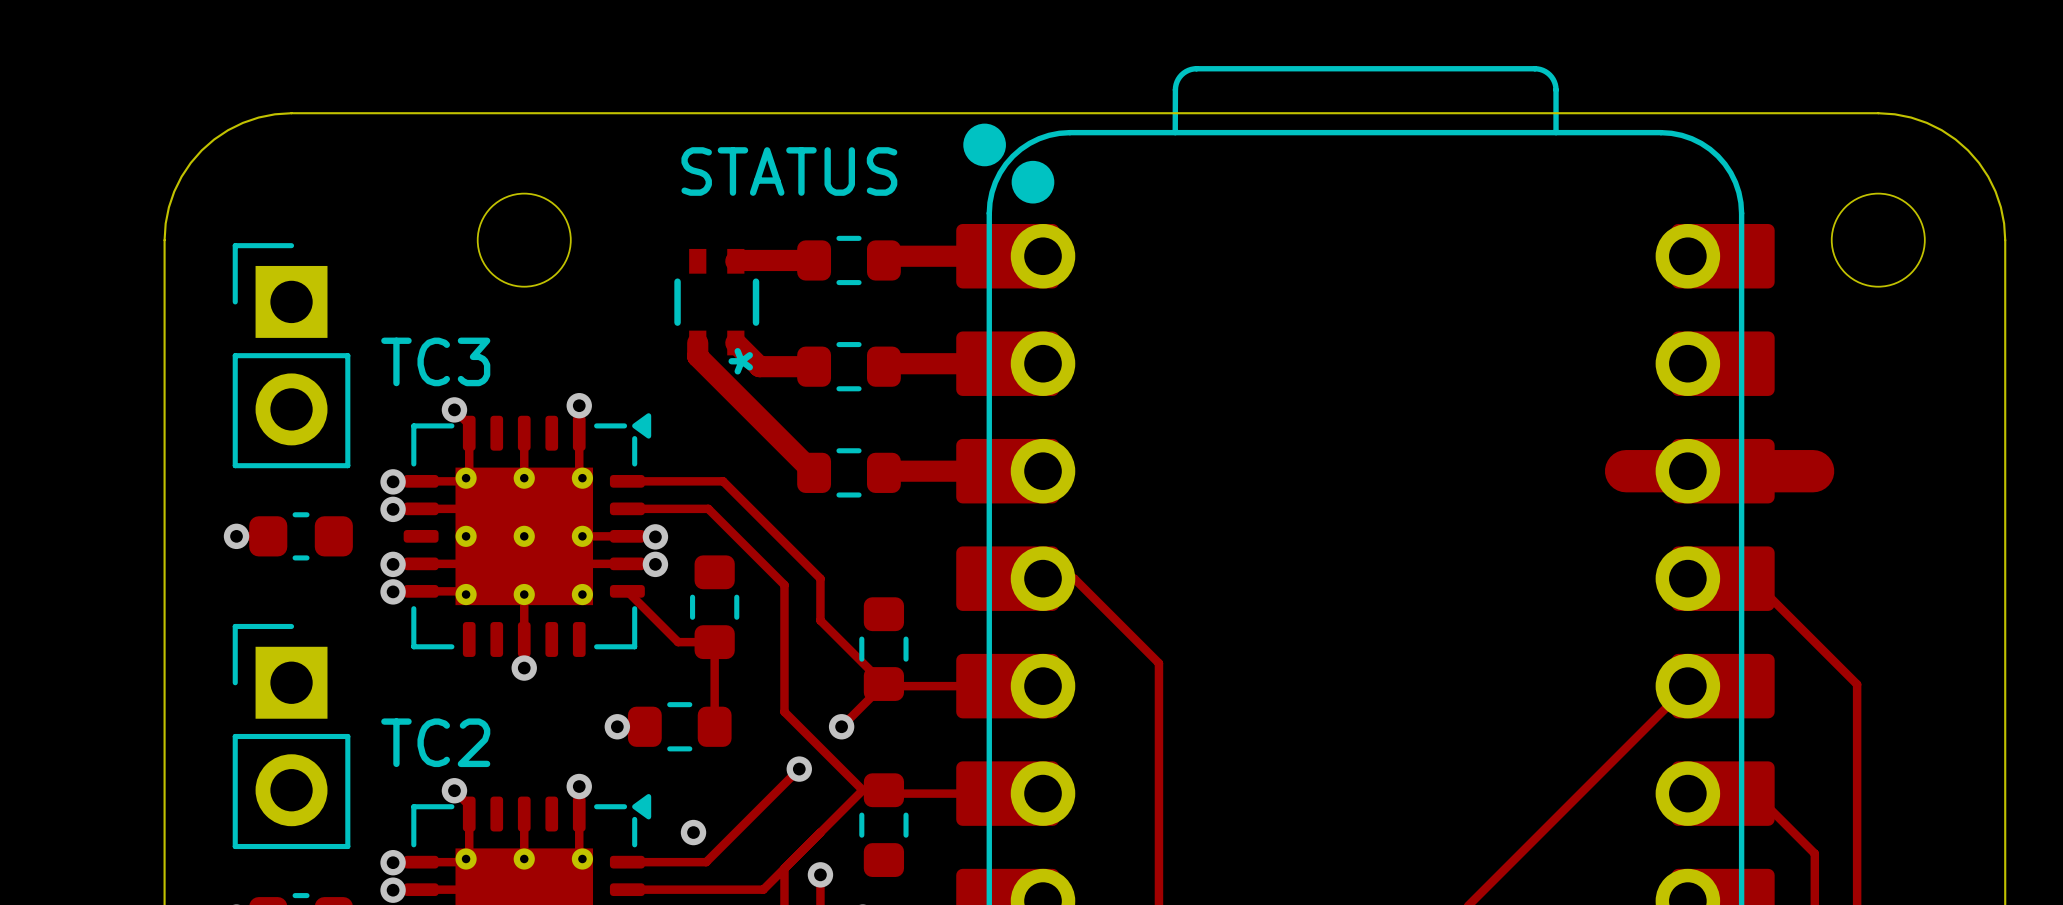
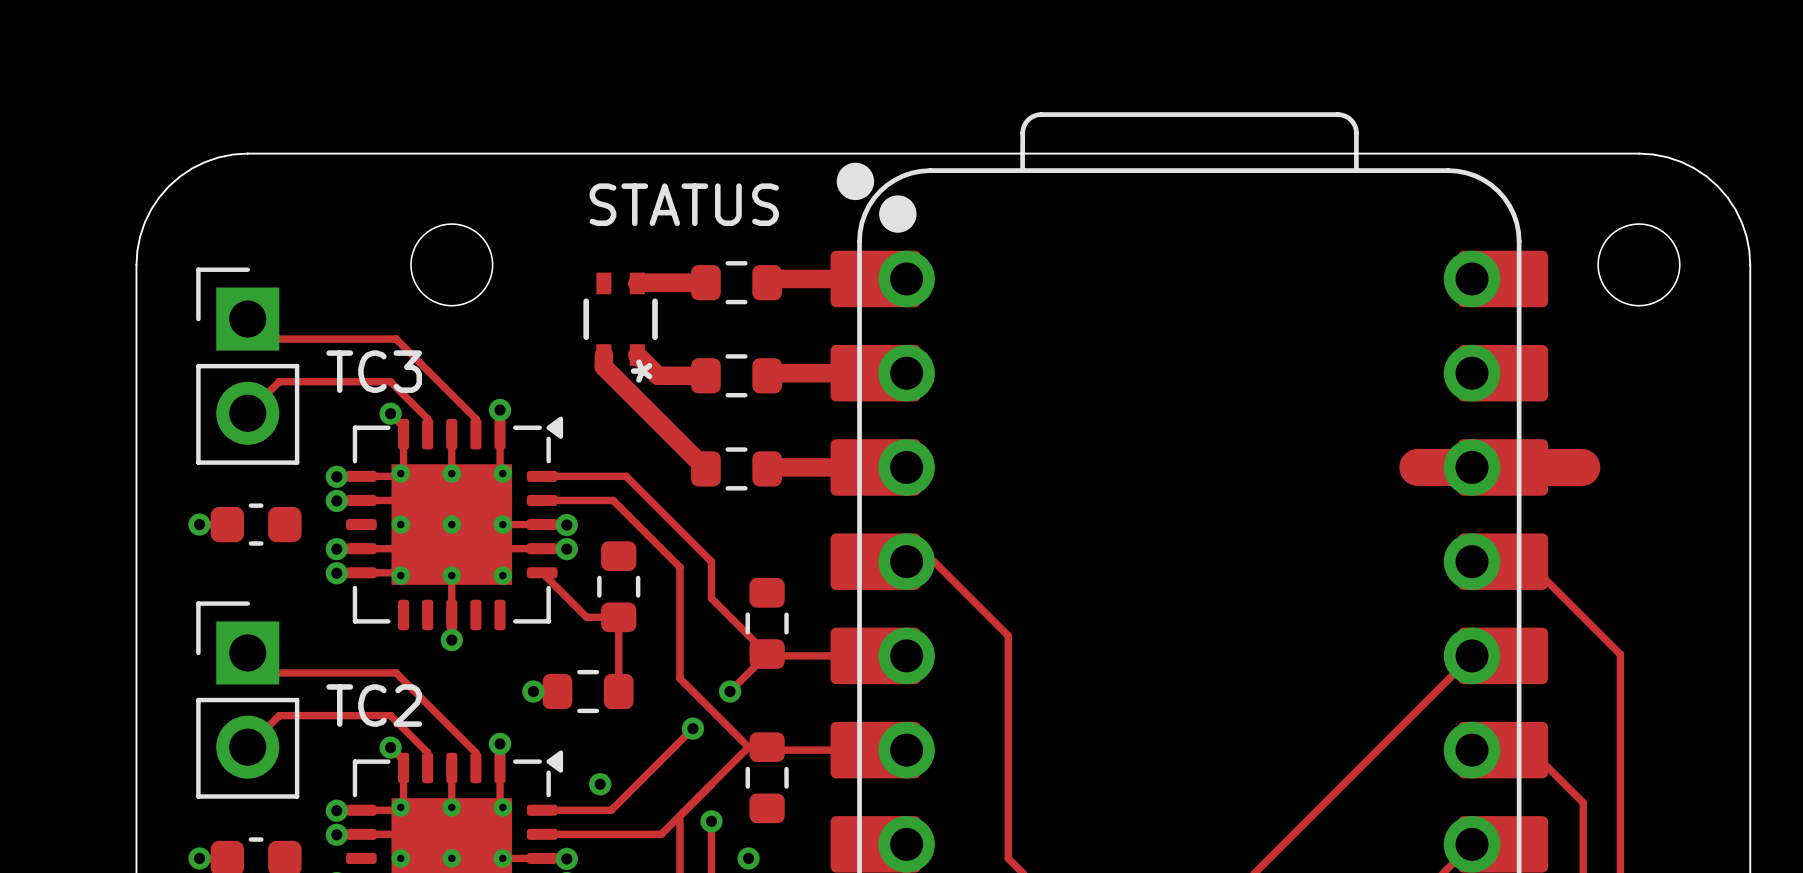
track: none -> (247, 319) (267, 339) (396, 339) (475, 418) (475, 434)
track: none -> (247, 413) (279, 381) (390, 381) (427, 418) (427, 434)
track: none -> (247, 652) (267, 672) (396, 672) (475, 752) (475, 768)
track: none -> (247, 747) (279, 715) (390, 715) (427, 752) (427, 768)

